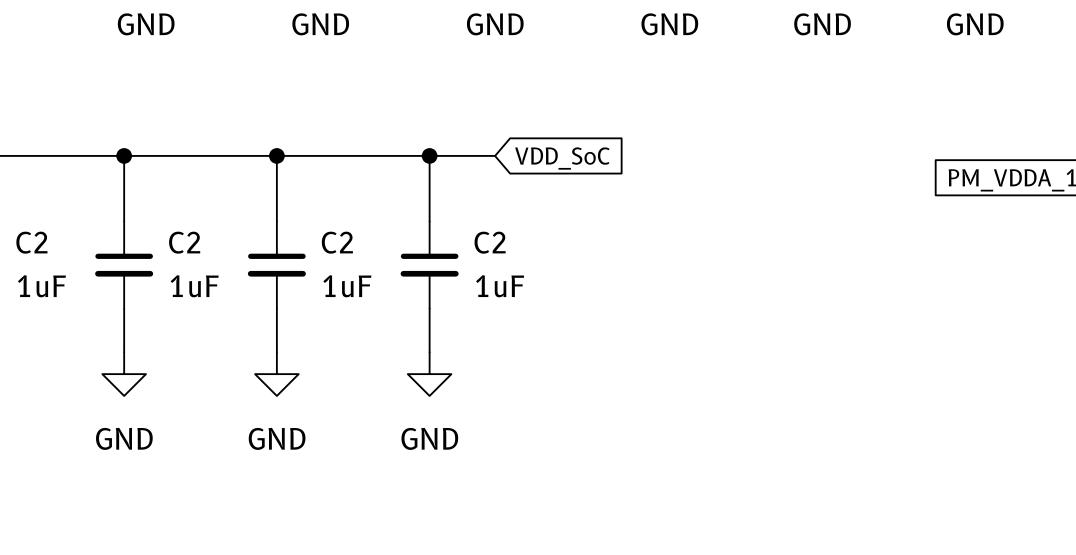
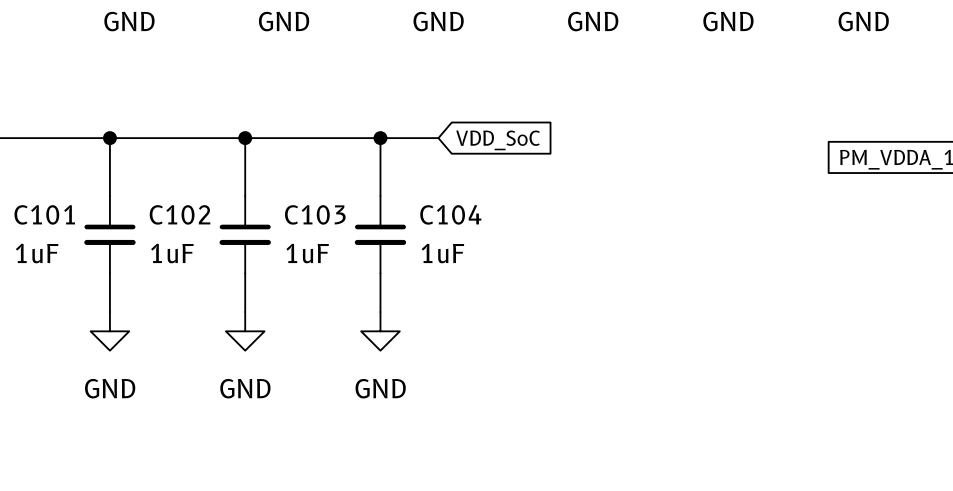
C2 name: C2 (31, 242) -> C101 (44, 214)
C2 name: C2 (184, 242) -> C102 (180, 214)
C2 name: C2 (337, 242) -> C103 (315, 214)
C2 name: C2 (490, 242) -> C104 (450, 214)

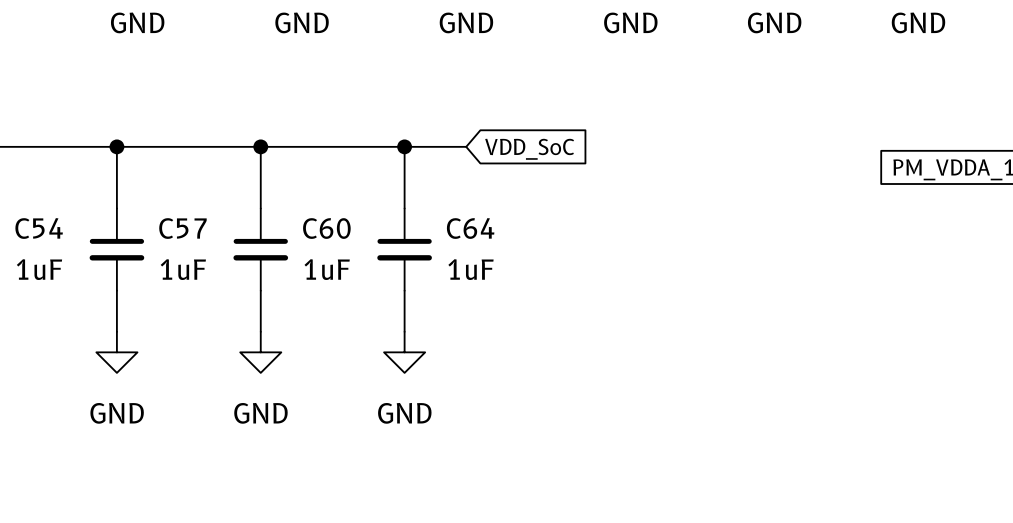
C101 name: C101 (44, 214) -> C54 (39, 228)
C102 name: C102 (180, 214) -> C57 (182, 228)
C103 name: C103 (315, 214) -> C60 (326, 228)
C104 name: C104 (450, 214) -> C64 (470, 228)

